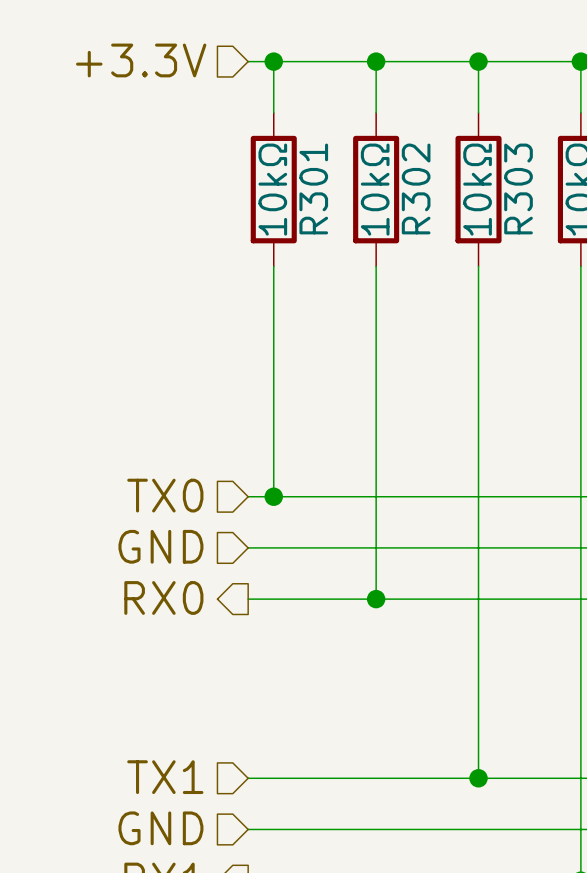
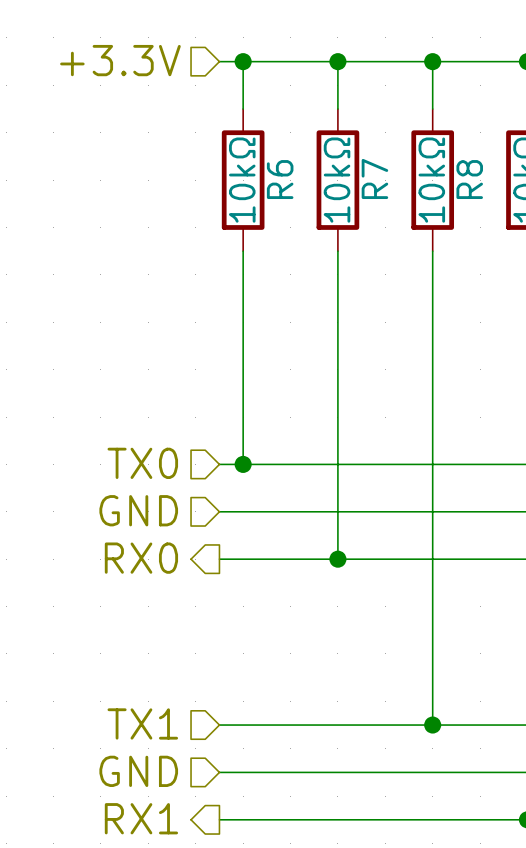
R301 name: R301 (313, 188) -> R6 (280, 179)
R302 name: R302 (416, 188) -> R7 (374, 178)
R303 name: R303 (518, 188) -> R8 (469, 179)

